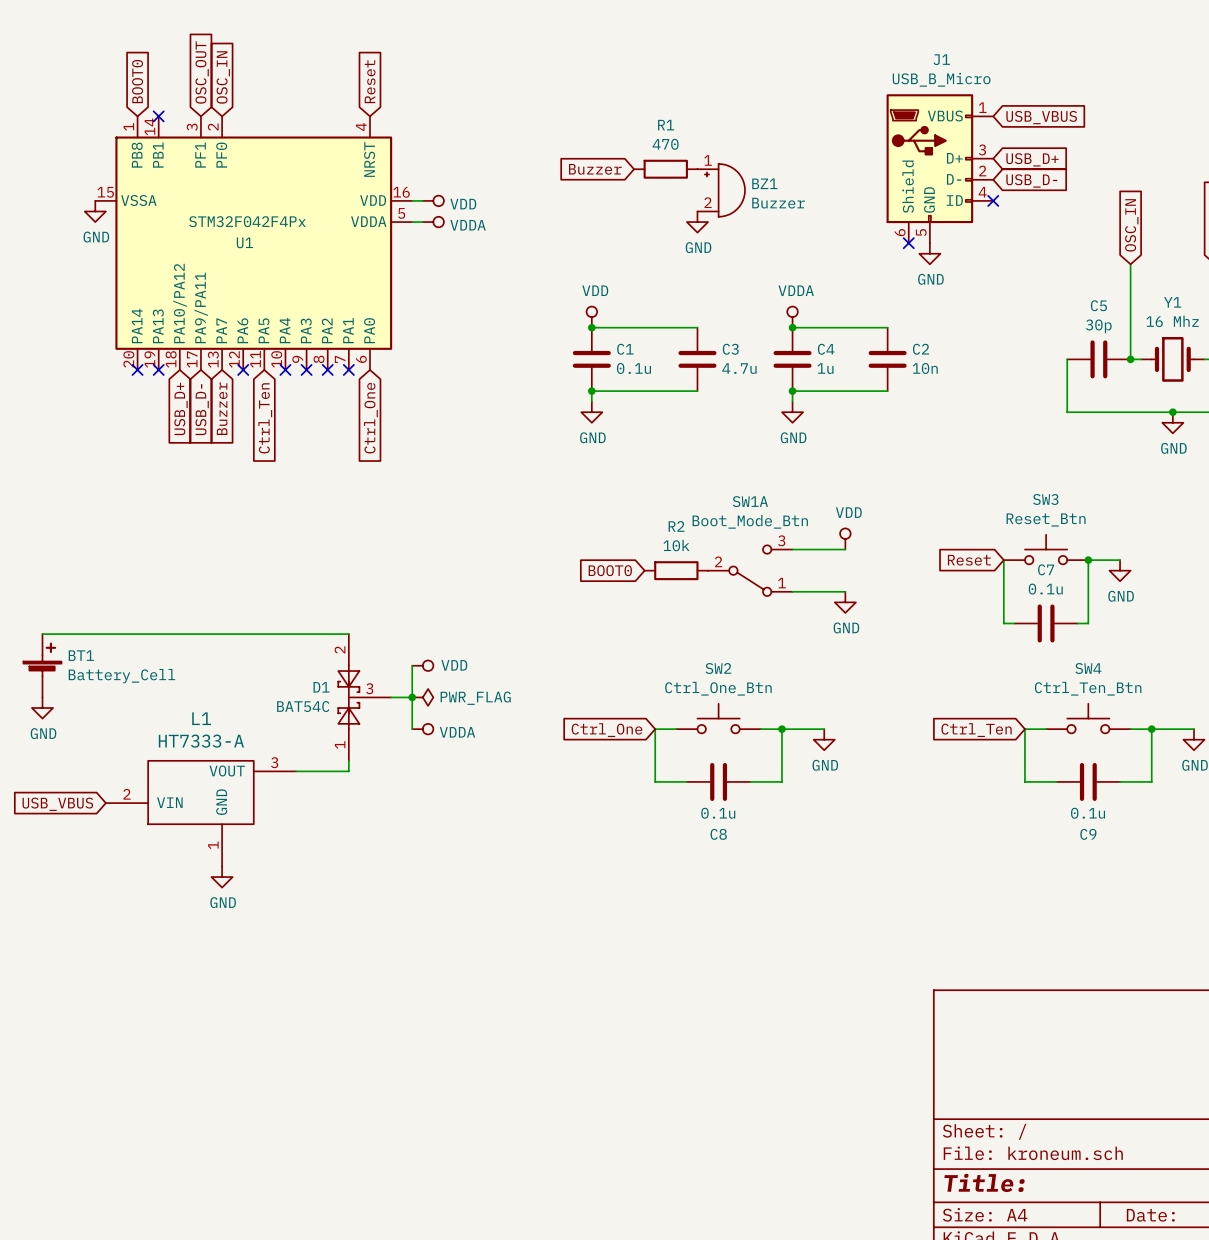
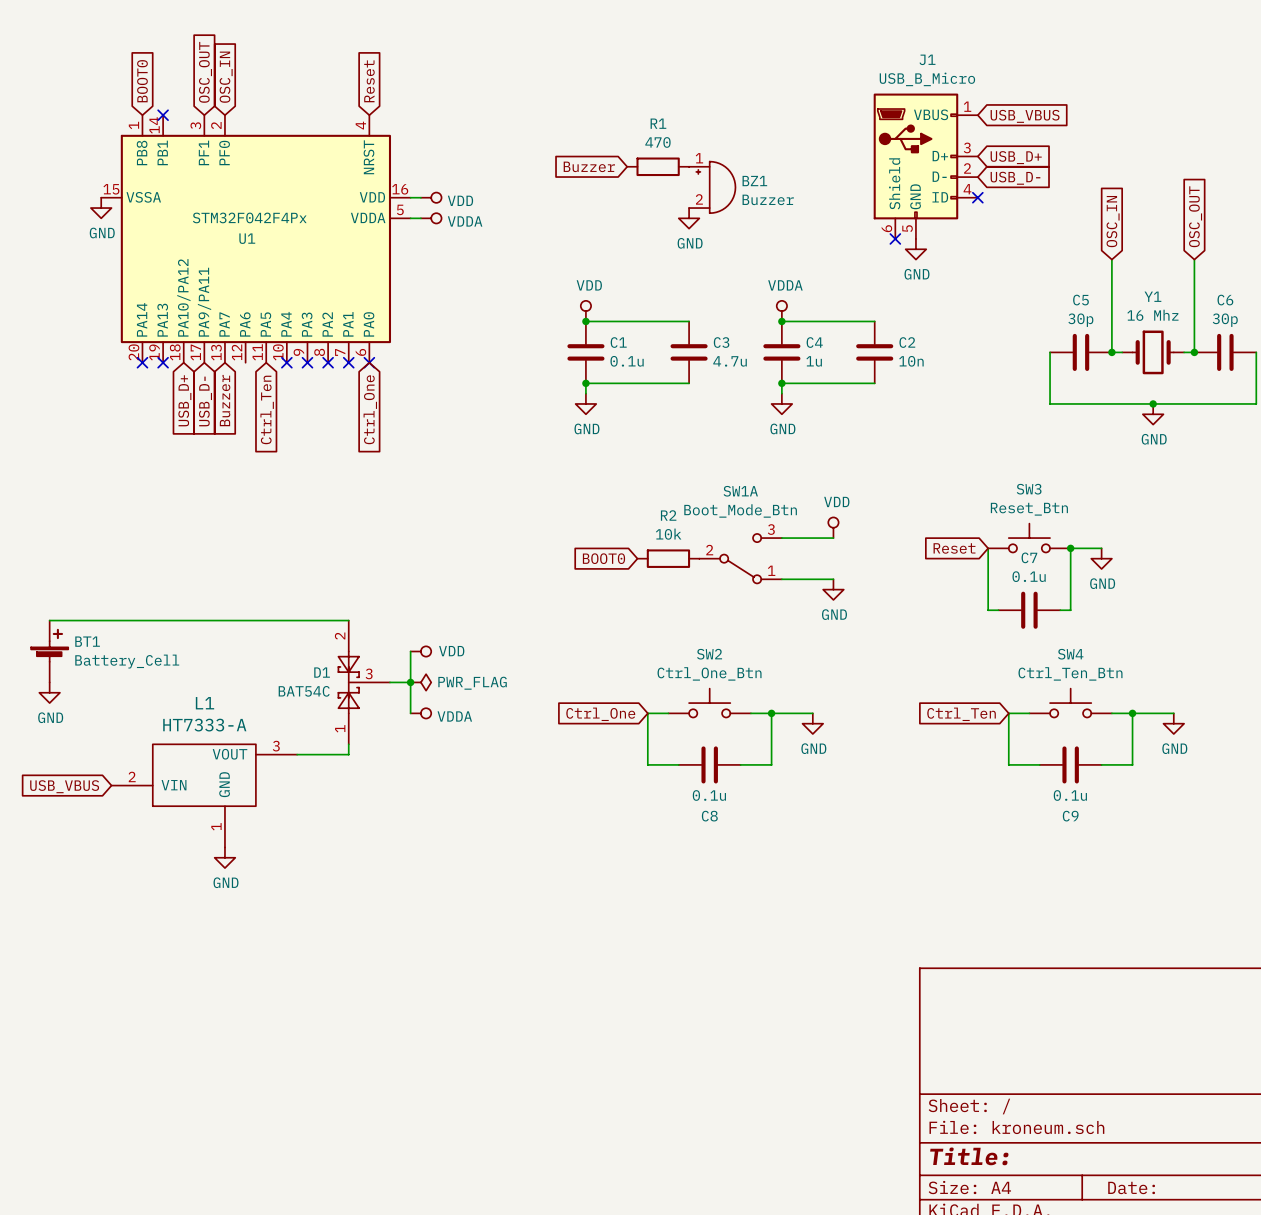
no-connect mark: (243, 369) -> none
no-connect mark: none -> (369, 362)

